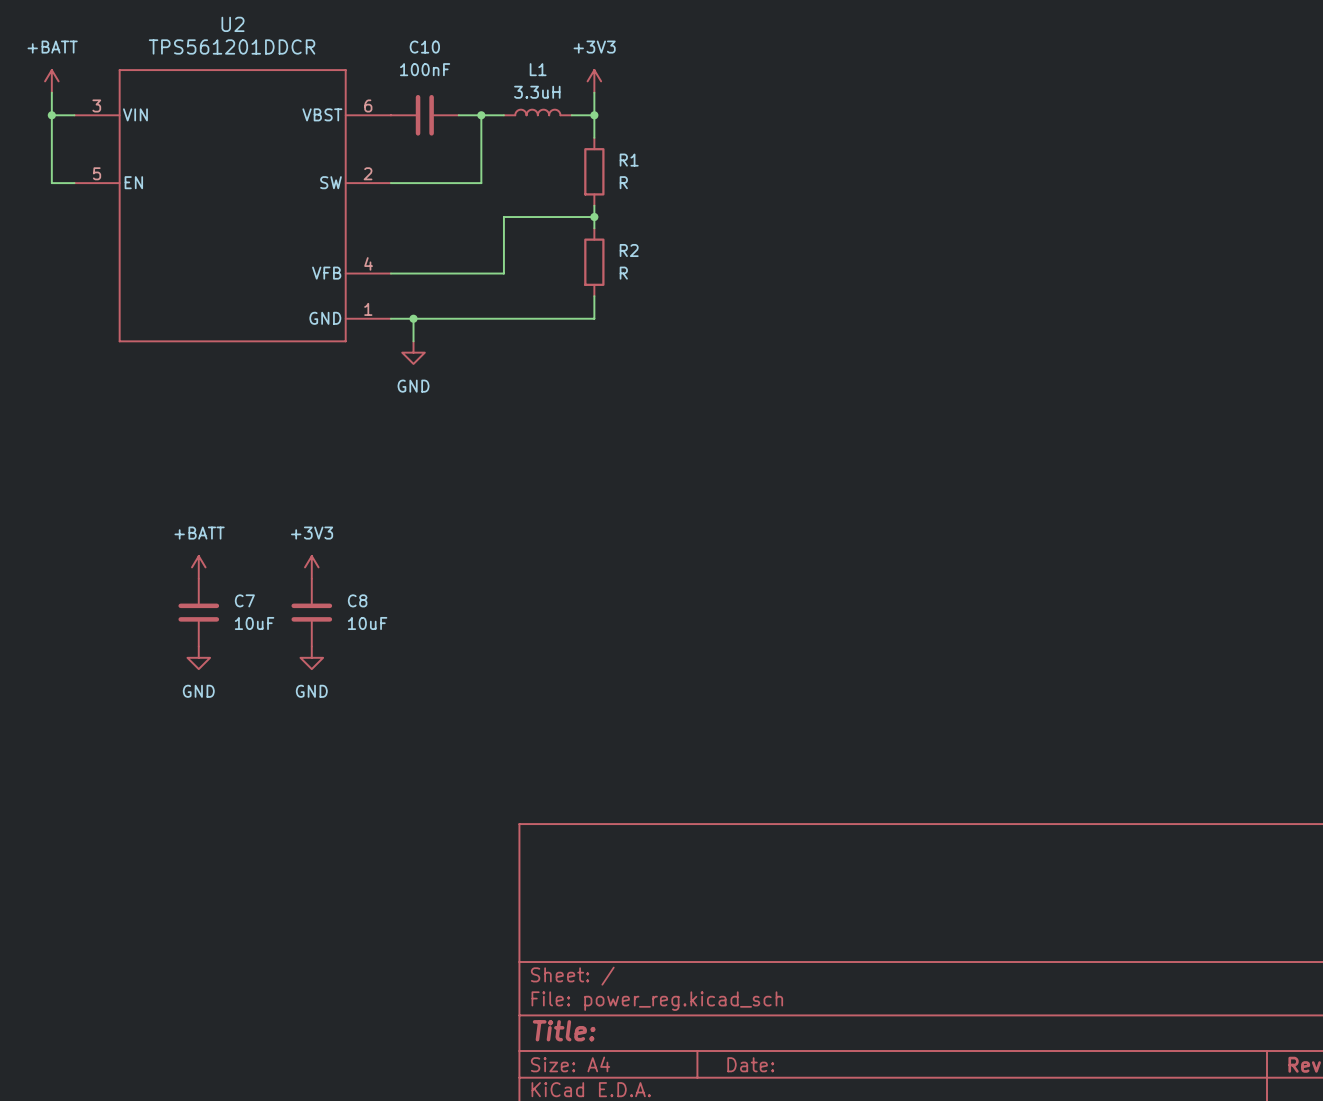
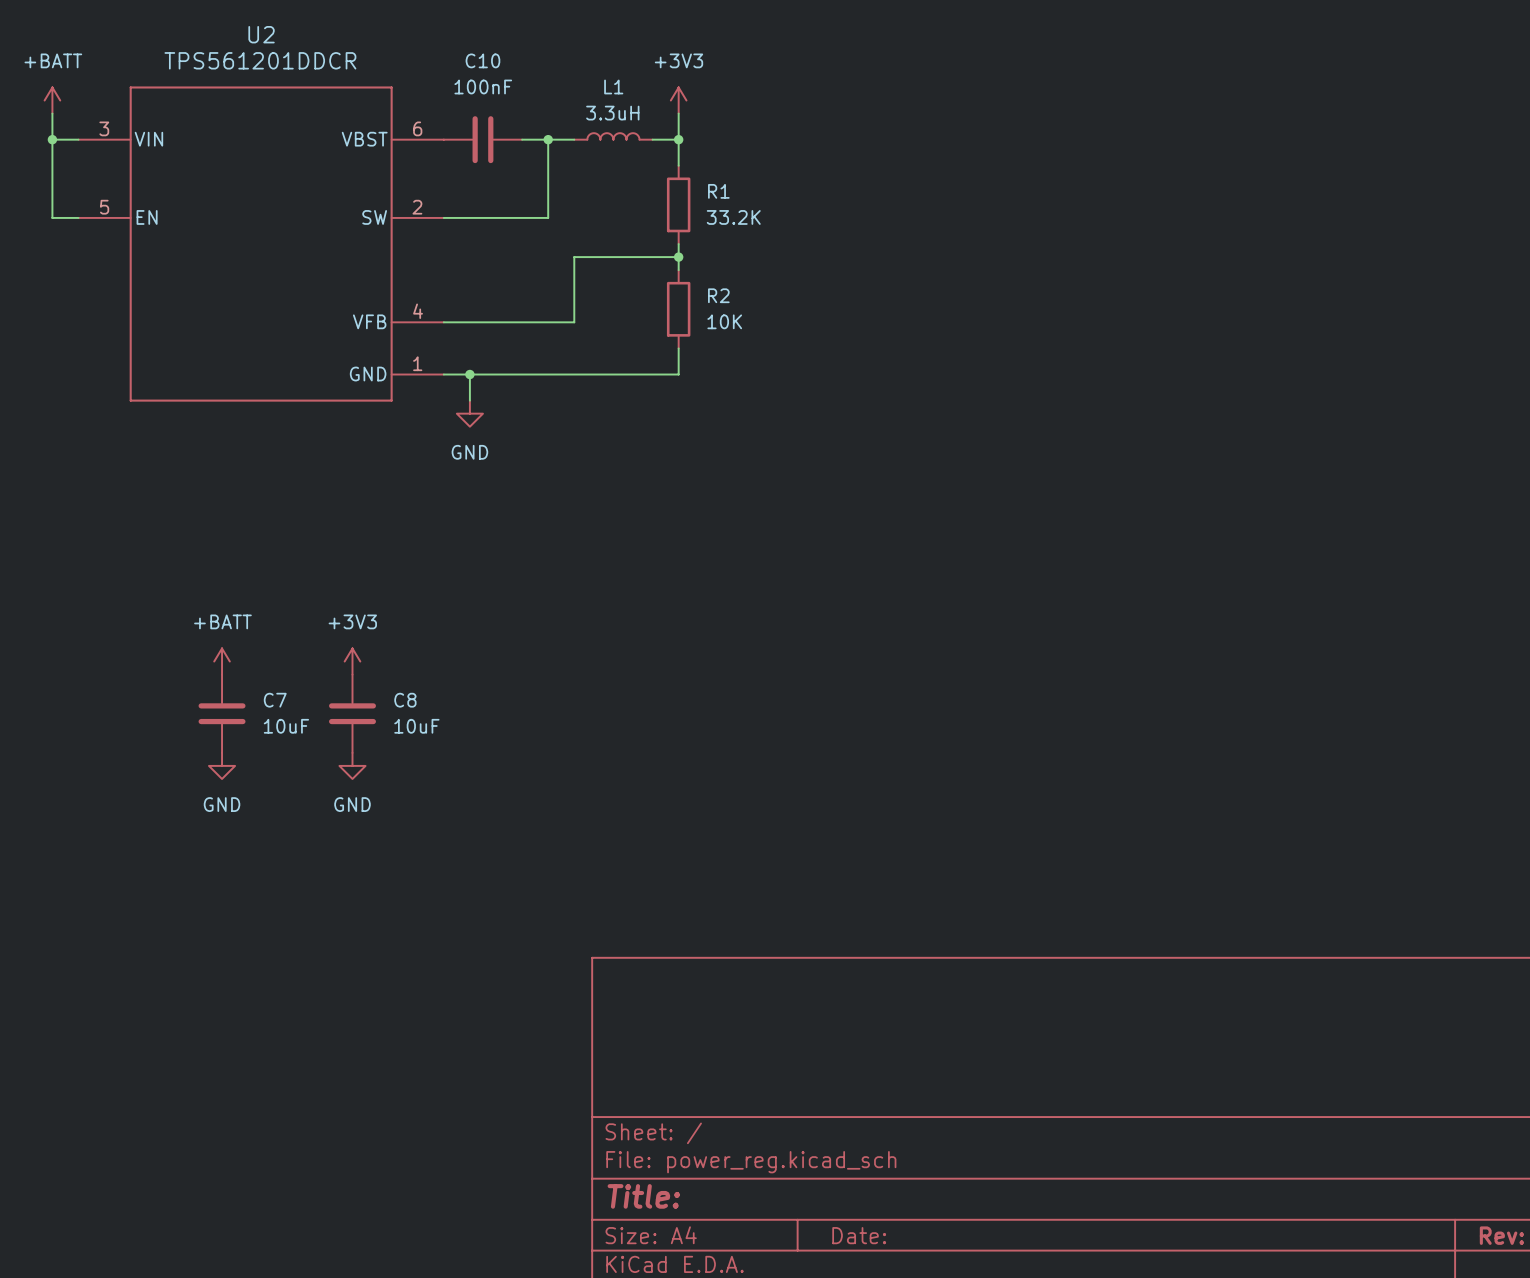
R1 value: R (623, 182) -> 33.2K (733, 217)
R2 value: R (623, 273) -> 10K (724, 321)

